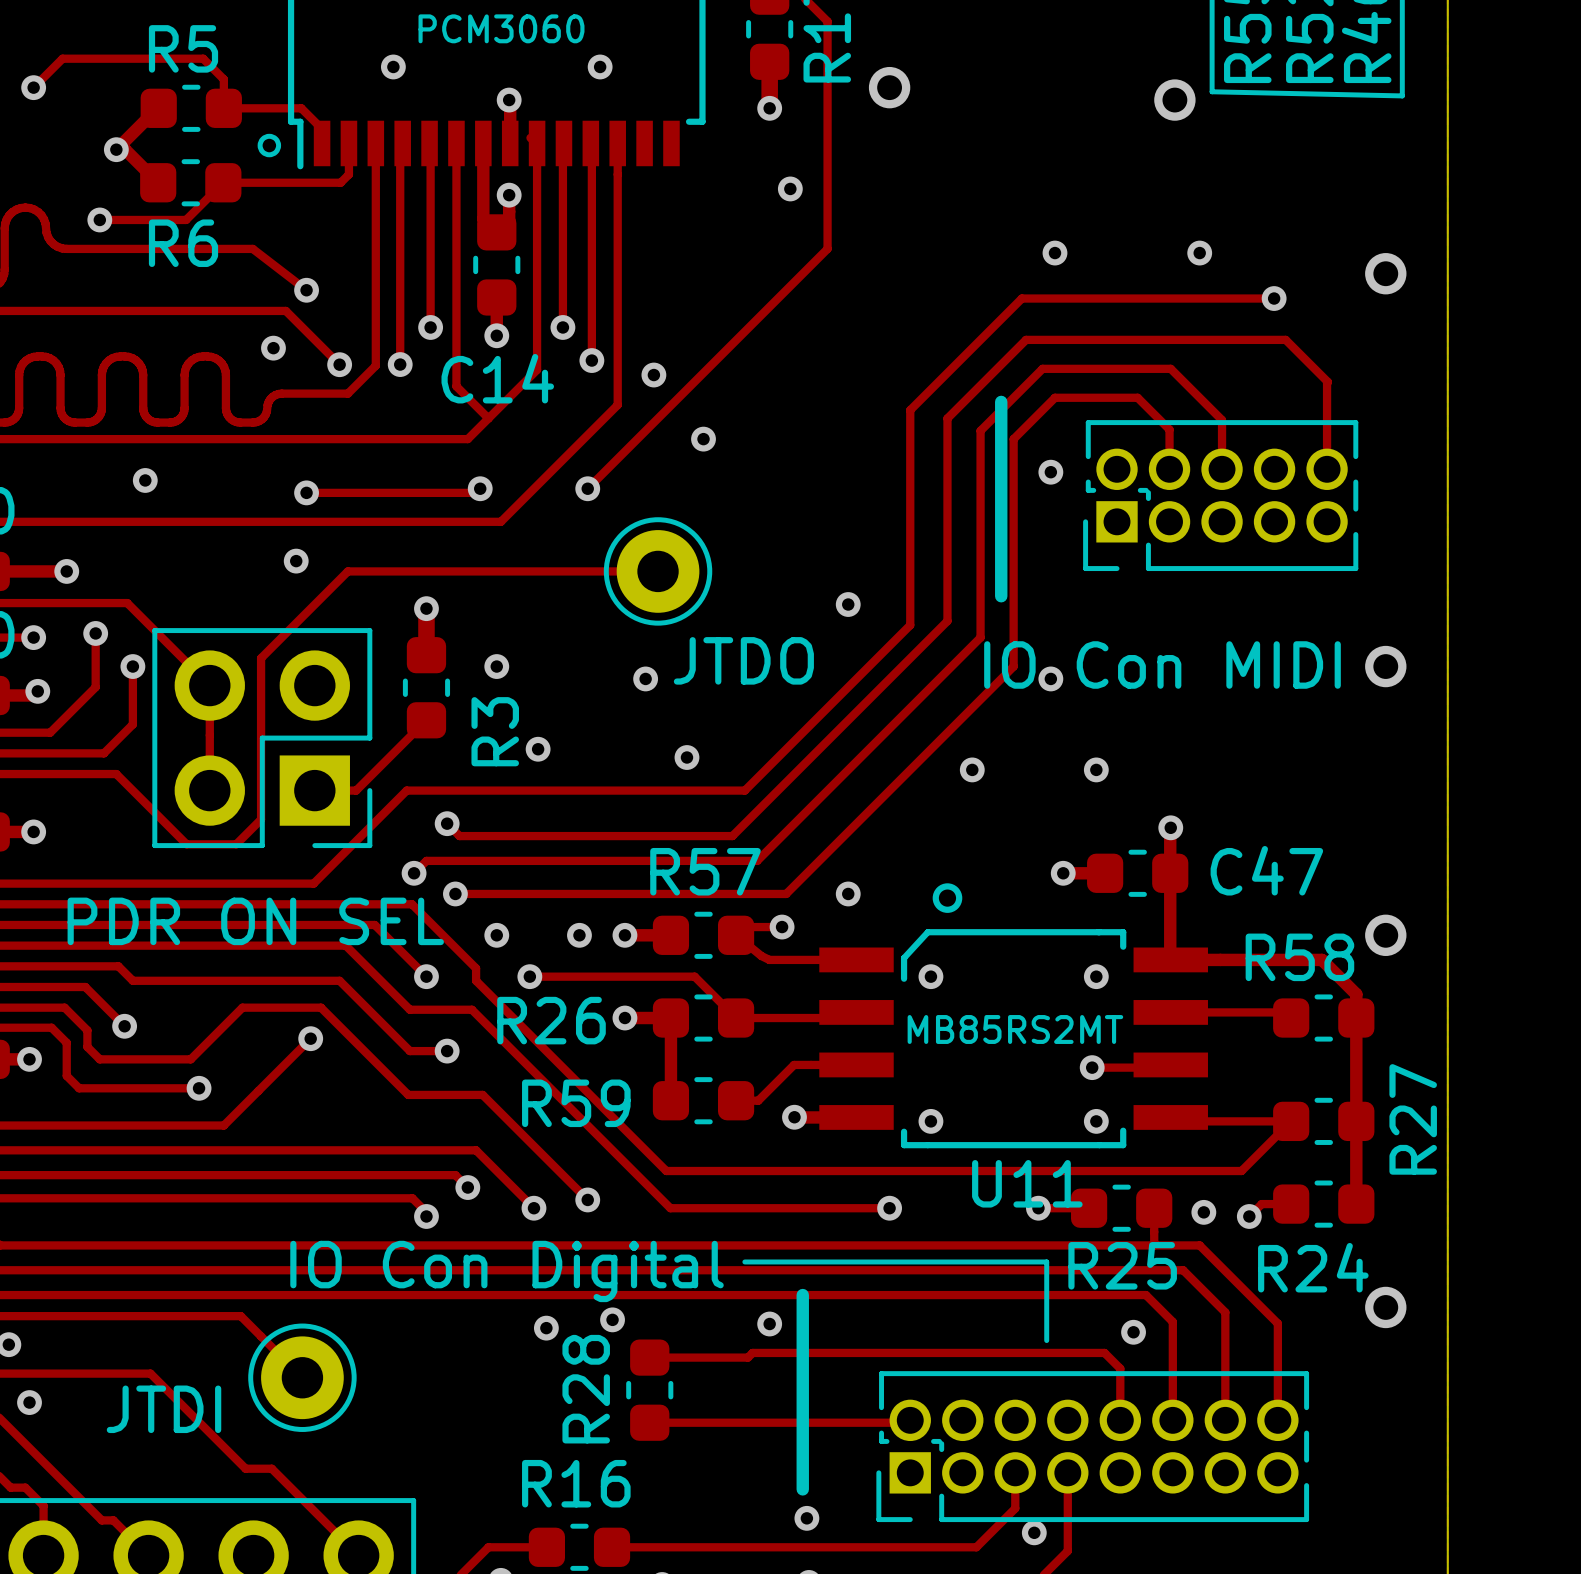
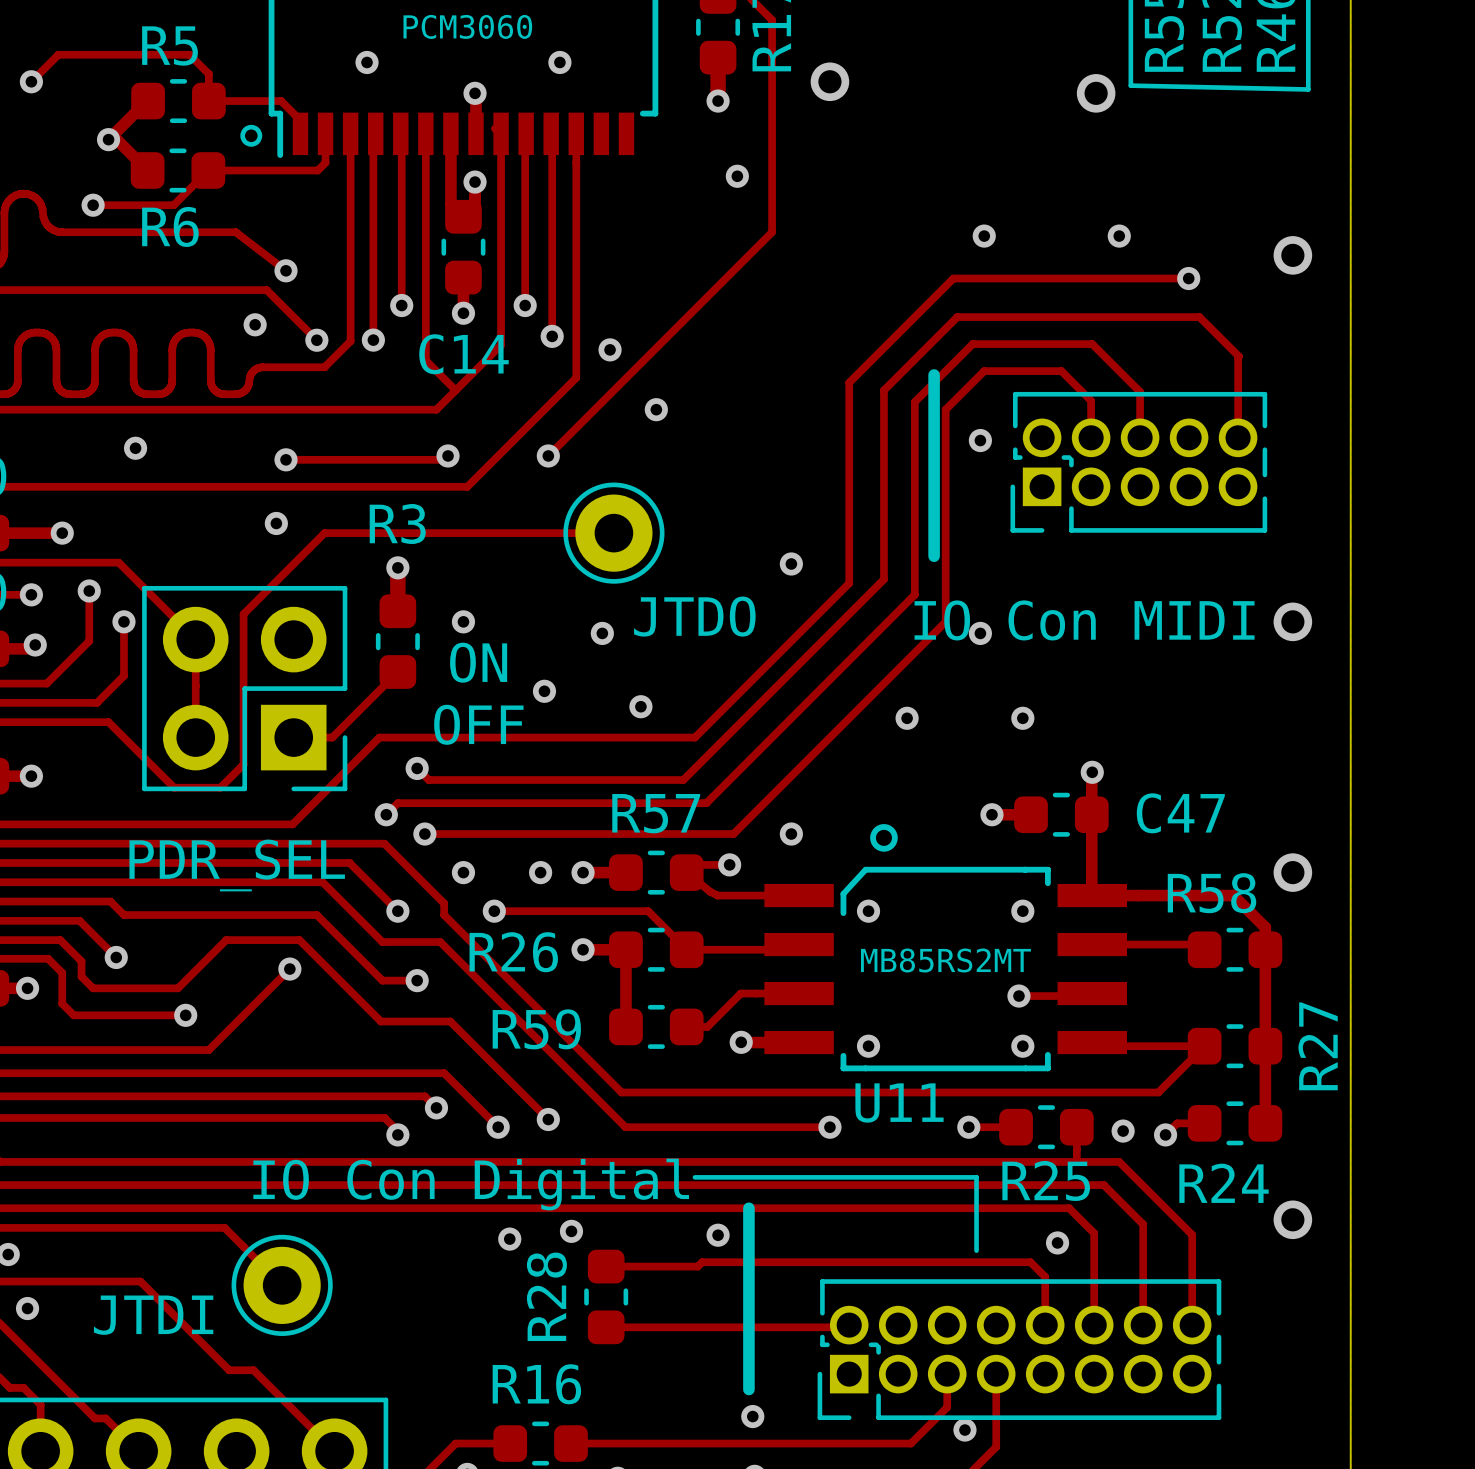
text: none -> ON (478, 662)
R3 name rotation: 0° (495, 731) -> 90° clockwise (397, 524)
R3 name position: R3 (495, 731) -> R3 (397, 524)
via position: (538, 749) -> (544, 691)
text: none -> OFF (478, 724)
text: PDR ON SEL (255, 921) -> PDR_SEL (237, 865)
U11 name position: U11 (1027, 1183) -> U11 (899, 1103)

